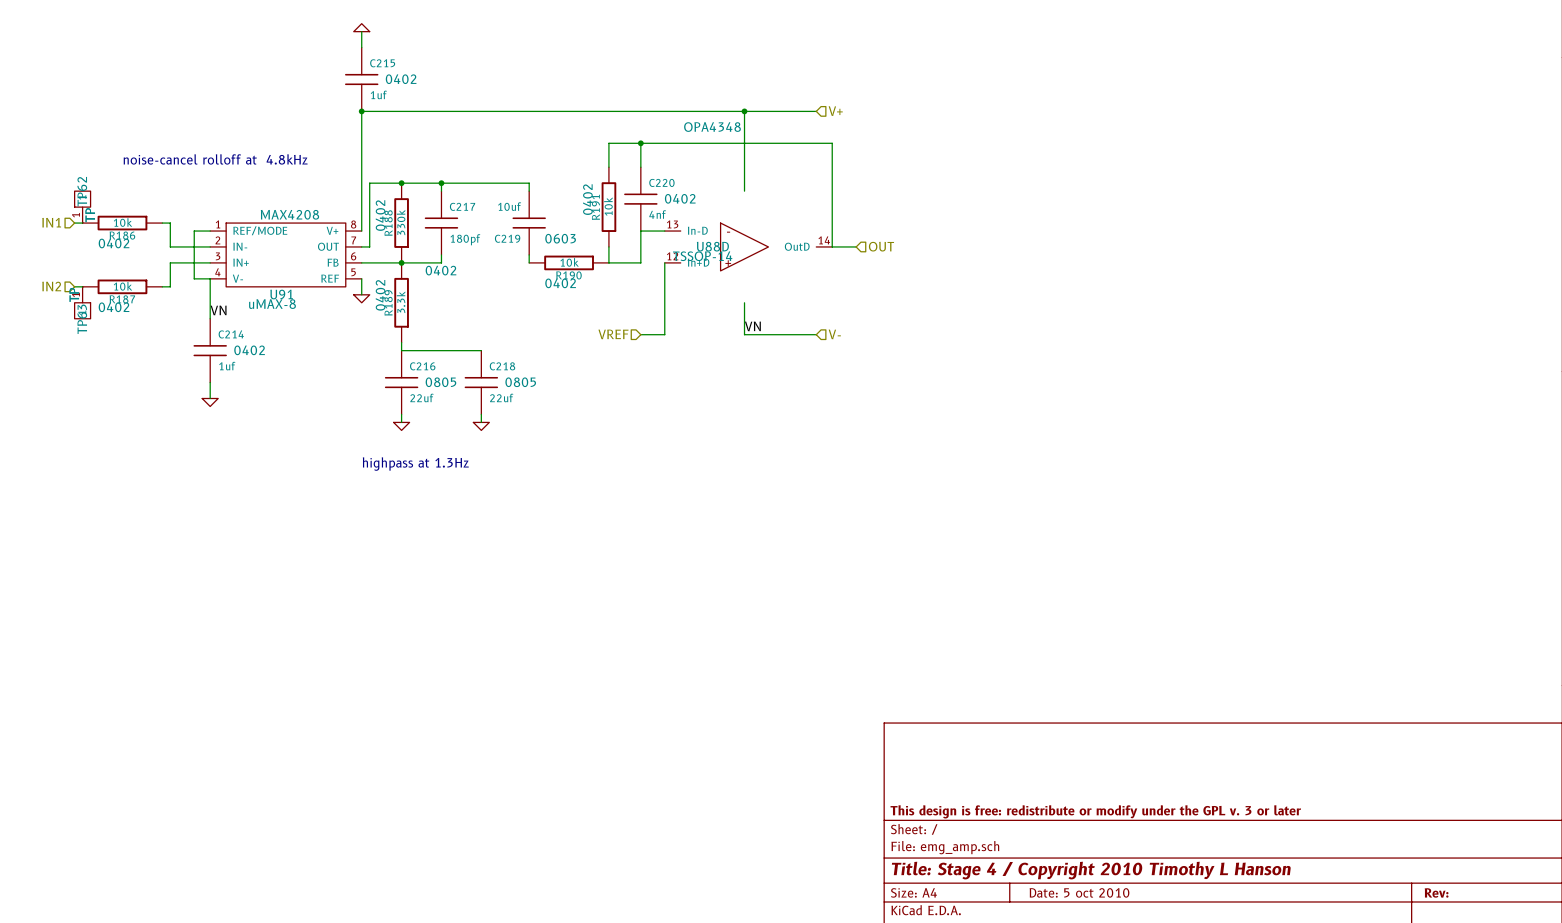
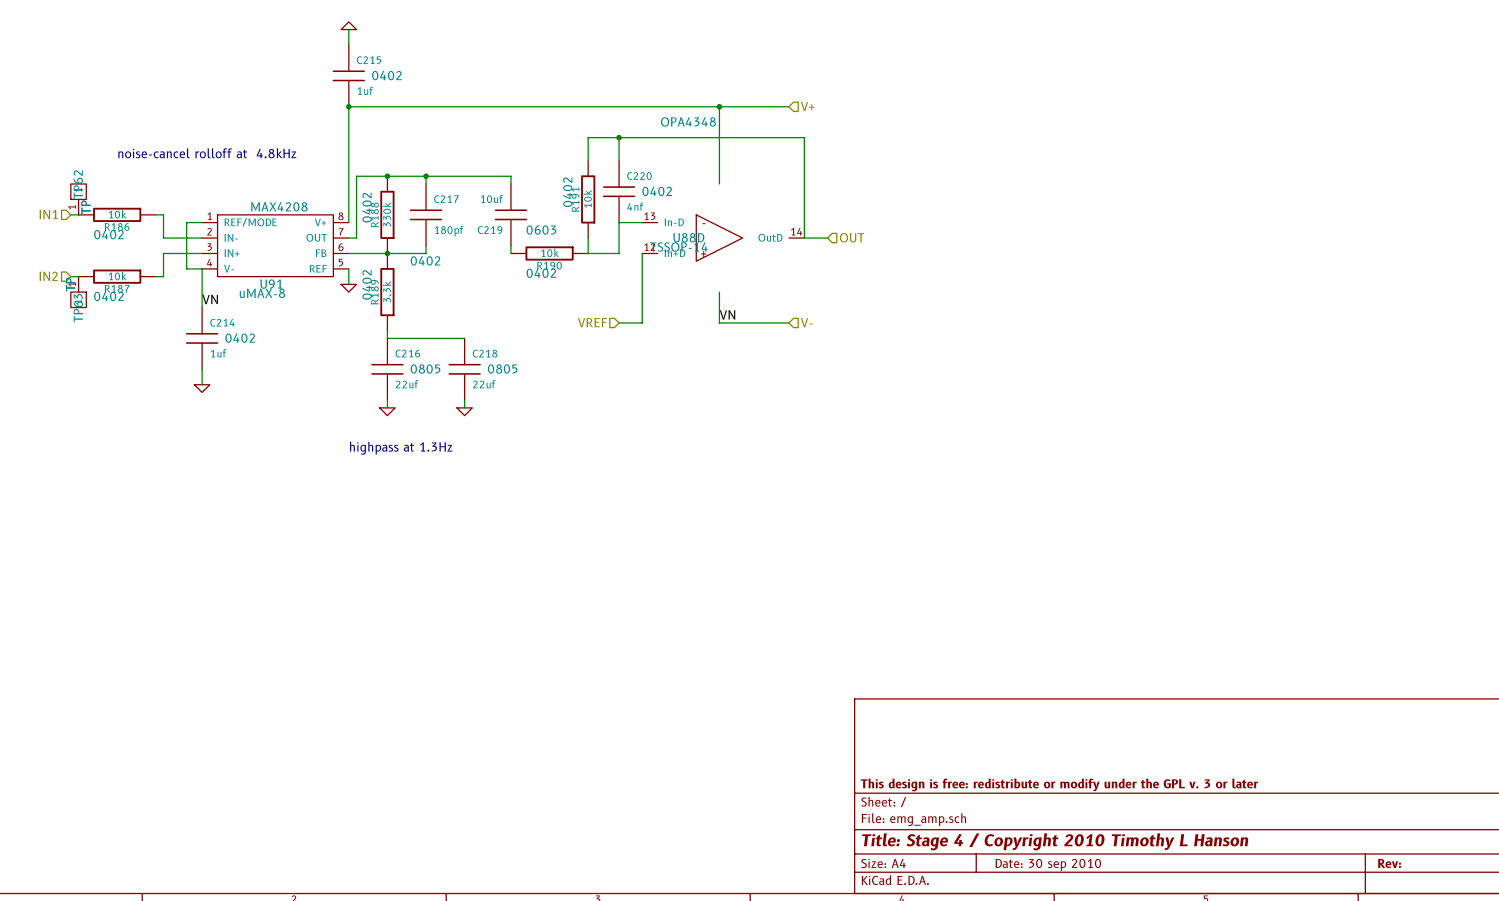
title block: Date: 5 oct 2010 (1079, 892) -> Date: 30 sep 2010 (1048, 864)

